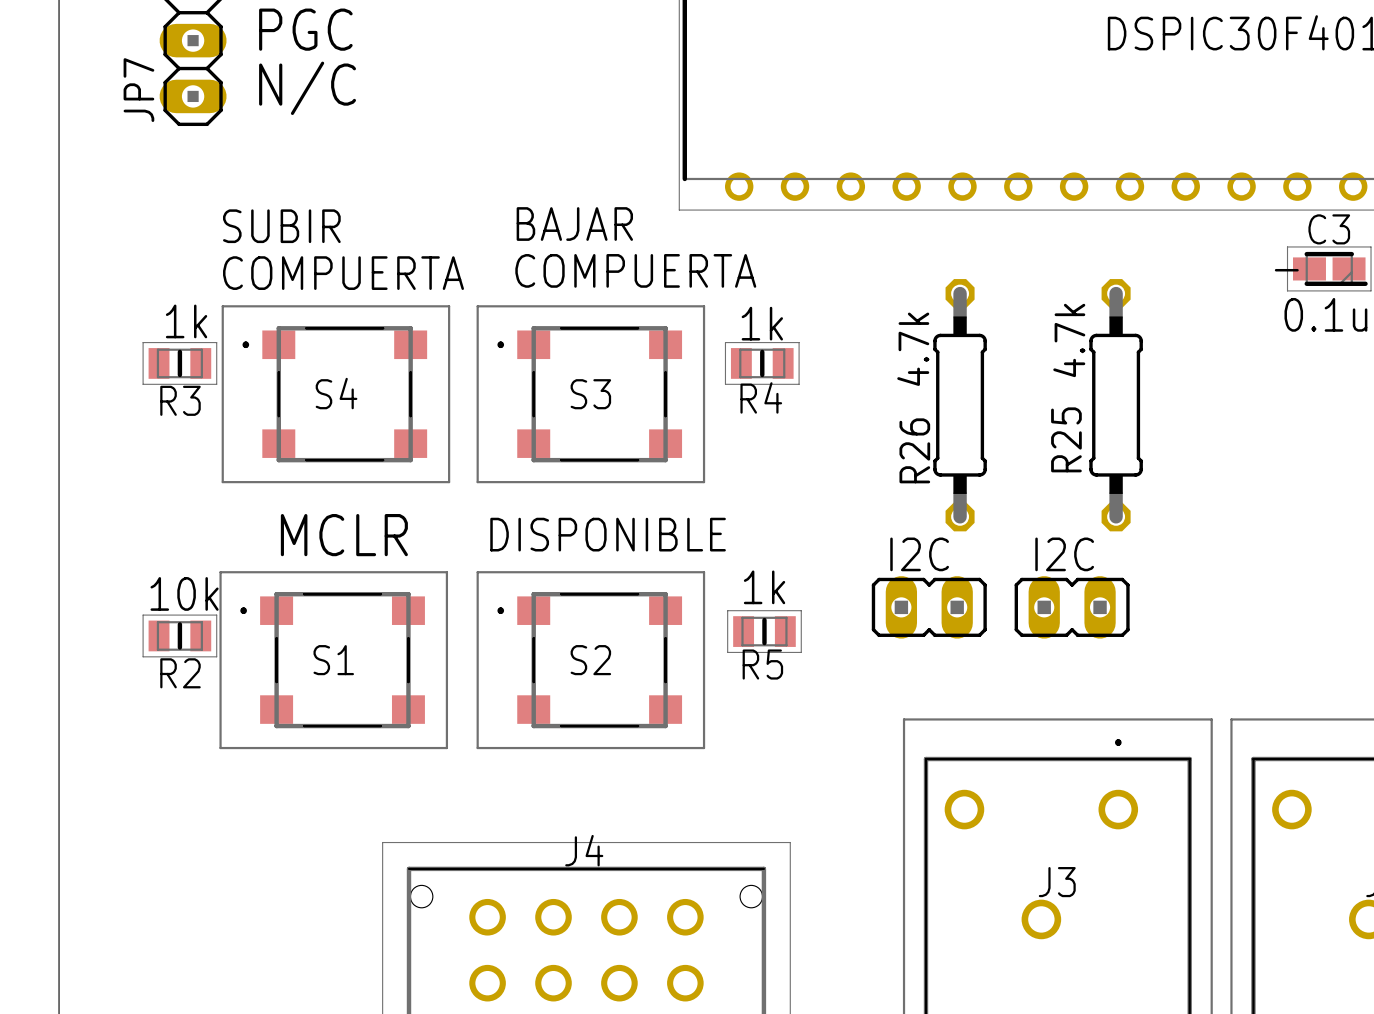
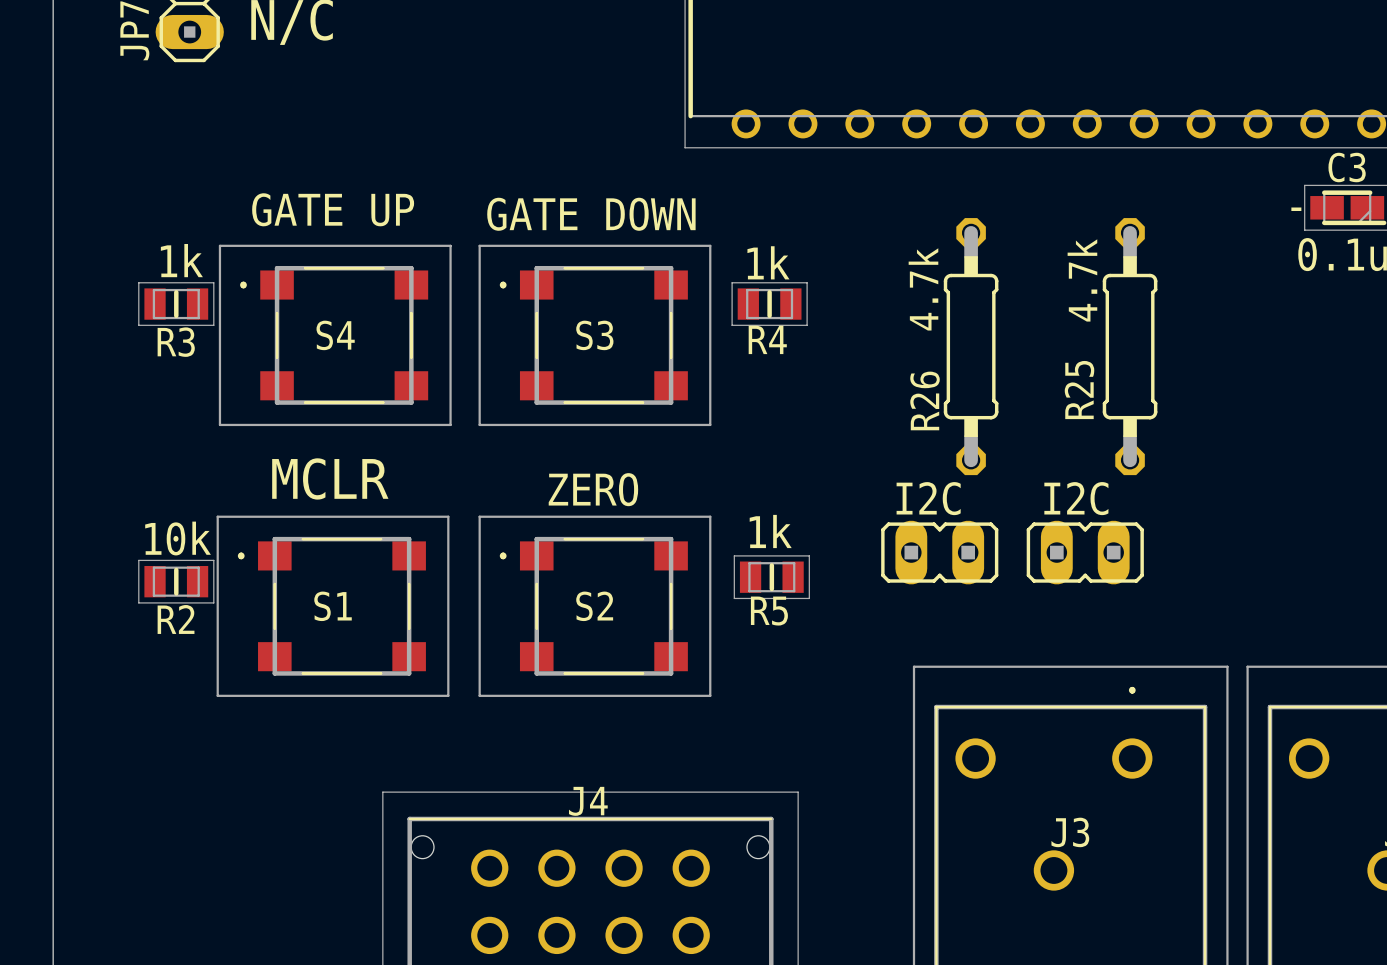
text: BAJAR (574, 224) -> none
text: SUBIR (281, 226) -> none
text: none -> GATE UP (333, 209)
text: COMPUERTA (635, 270) -> none
text: COMPUERTA (343, 273) -> none
text: none -> GATE DOWN (591, 214)
text: DISPONIBLE (608, 534) -> none
text: none -> ZERO (593, 489)

